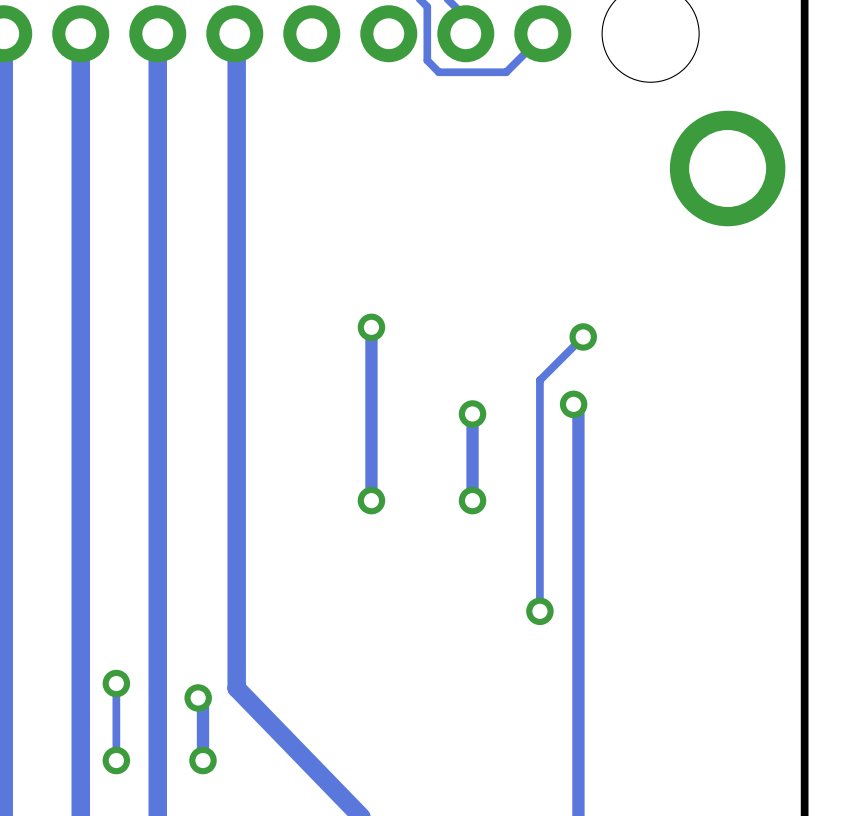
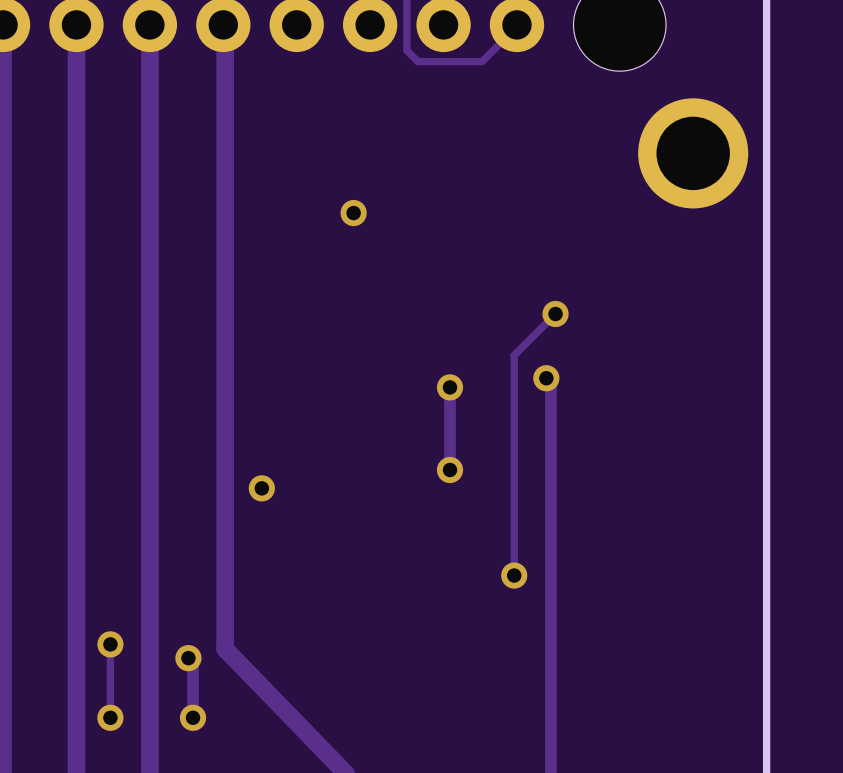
track: (371, 327) (371, 500) -> none
via position: (371, 327) -> (353, 213)
via position: (371, 500) -> (261, 488)

